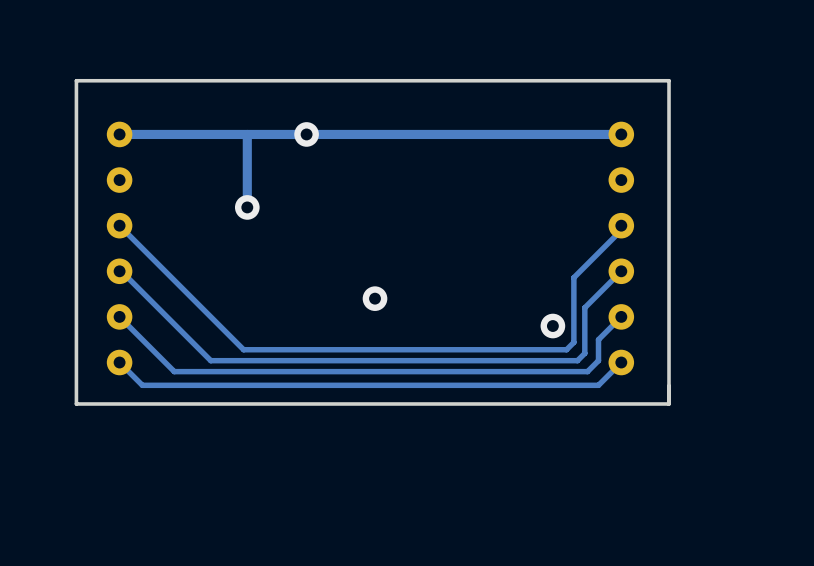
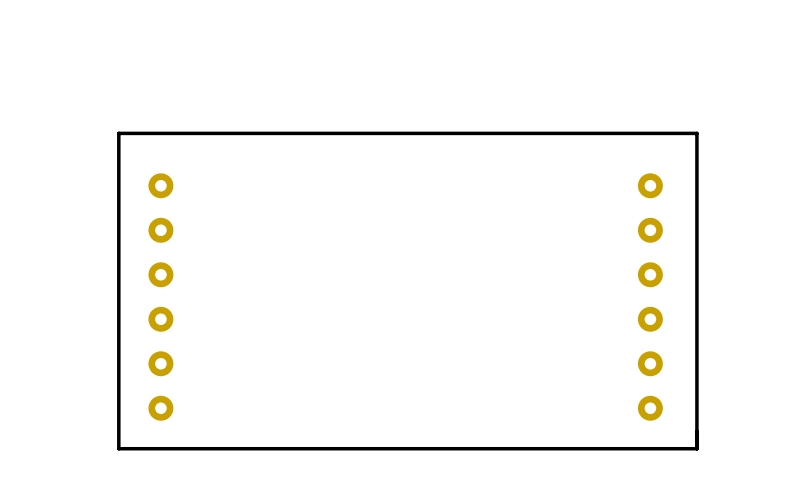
track: (247, 134) (247, 207) -> none
via: (306, 134) -> none
track: (621, 134) (119, 134) -> none
via: (247, 207) -> none
track: (621, 225) (621, 230) (573, 277) (573, 342) (566, 349) (243, 349) (119, 225) -> none
track: (621, 271) (584, 307) (584, 353) (577, 360) (210, 360) (119, 271) -> none
via: (375, 298) -> none
track: (621, 316) (598, 339) (598, 360) (587, 371) (174, 371) (119, 316) -> none
via: (552, 326) -> none
track: (621, 362) (598, 385) (142, 385) (119, 362) -> none

